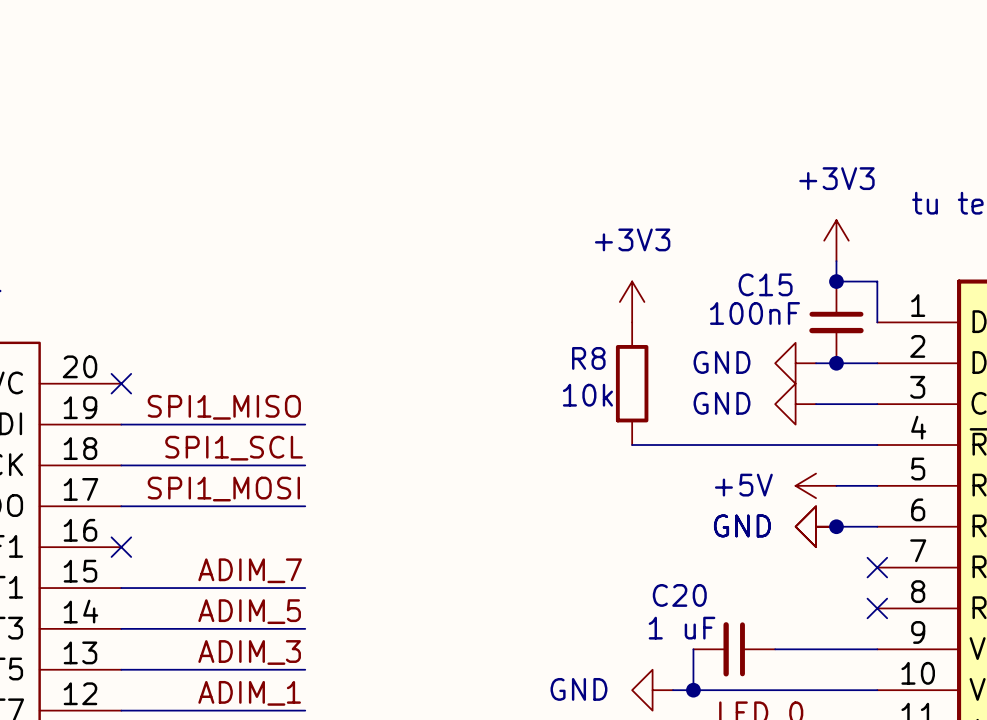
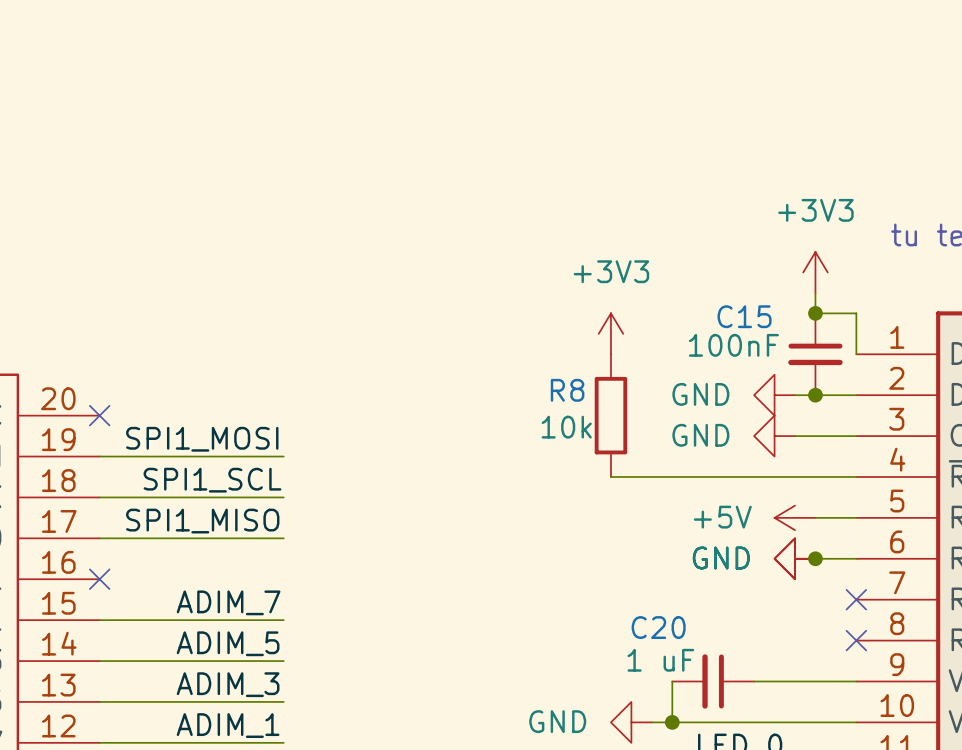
label: SPI1_MISO (224, 407) -> SPI1_MOSI (202, 439)
label: SPI1_MOSI (223, 489) -> SPI1_MISO (202, 521)

